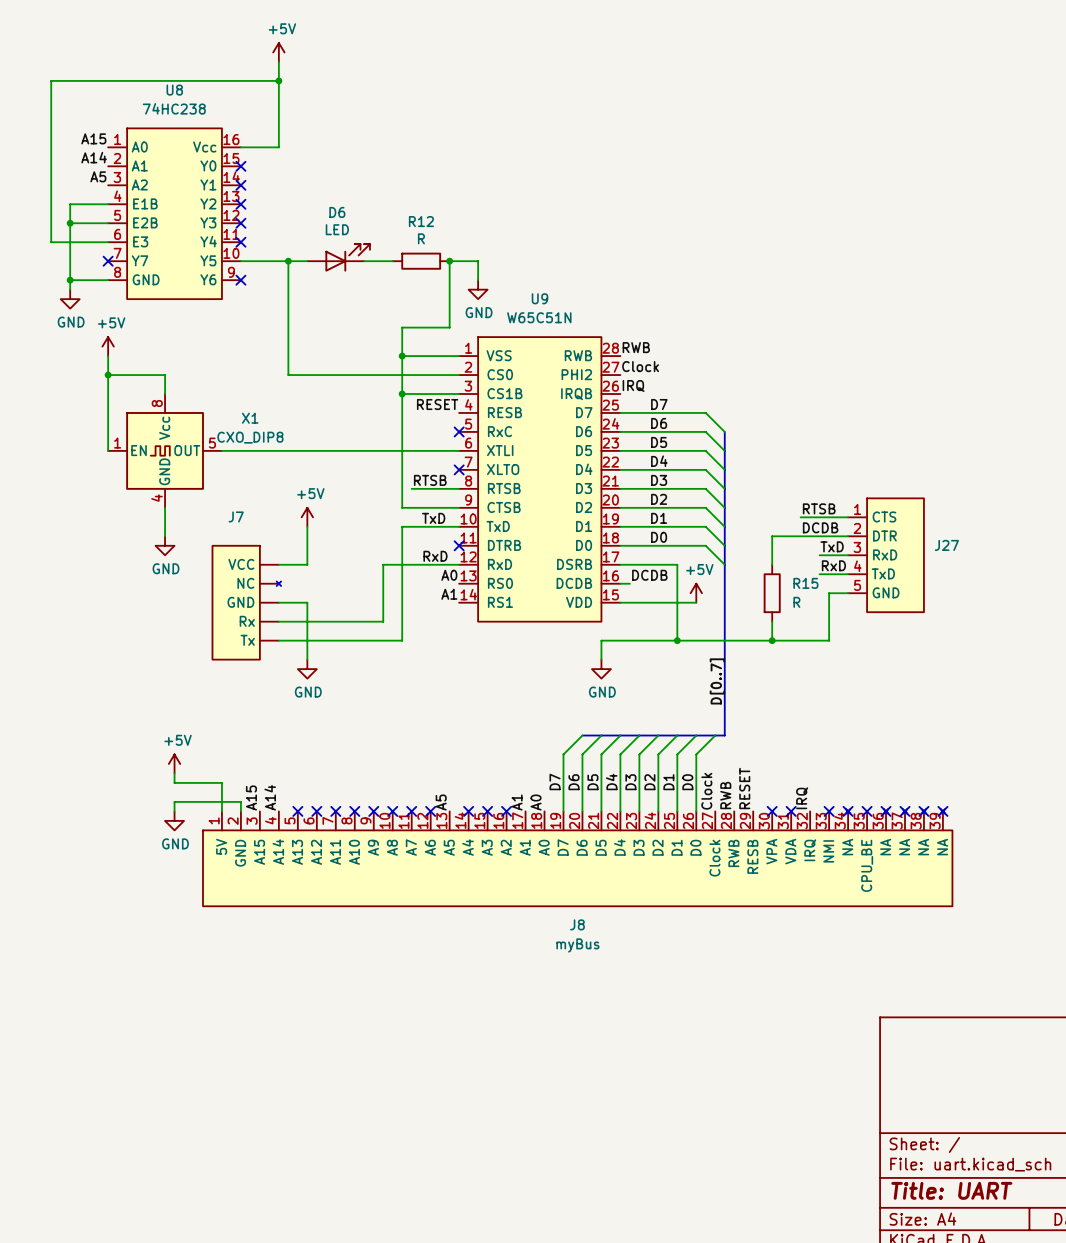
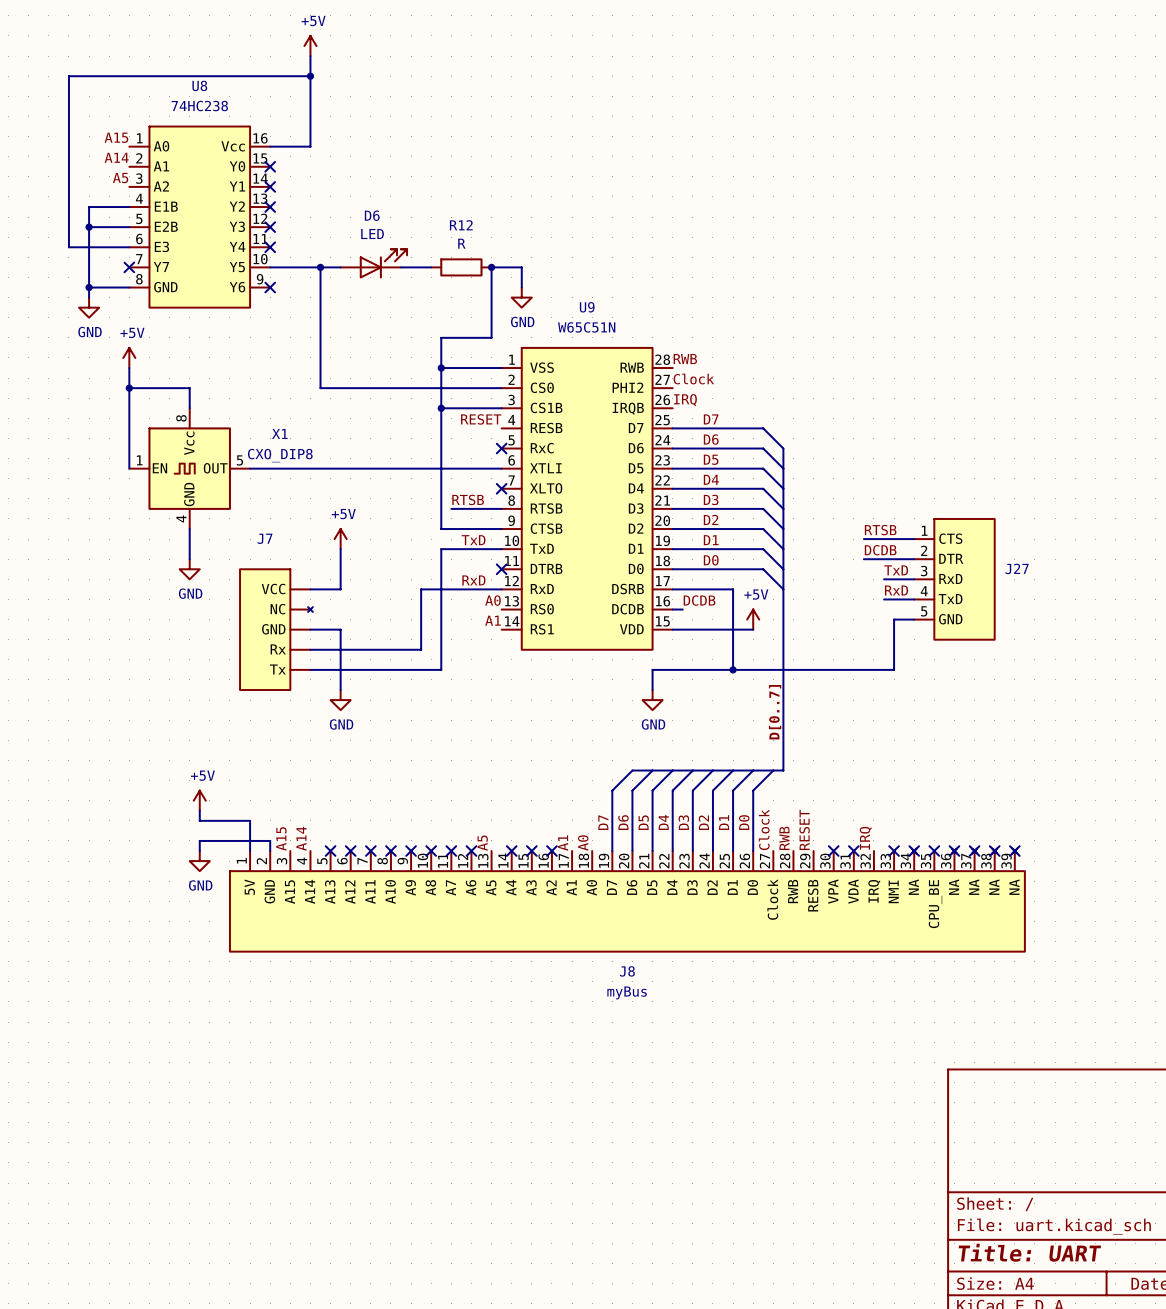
wire: (800, 536) (772, 536) (772, 564) -> none
R15: R (772, 593) -> none
wire: (772, 621) (772, 640) -> none
junction: (772, 640) -> none

